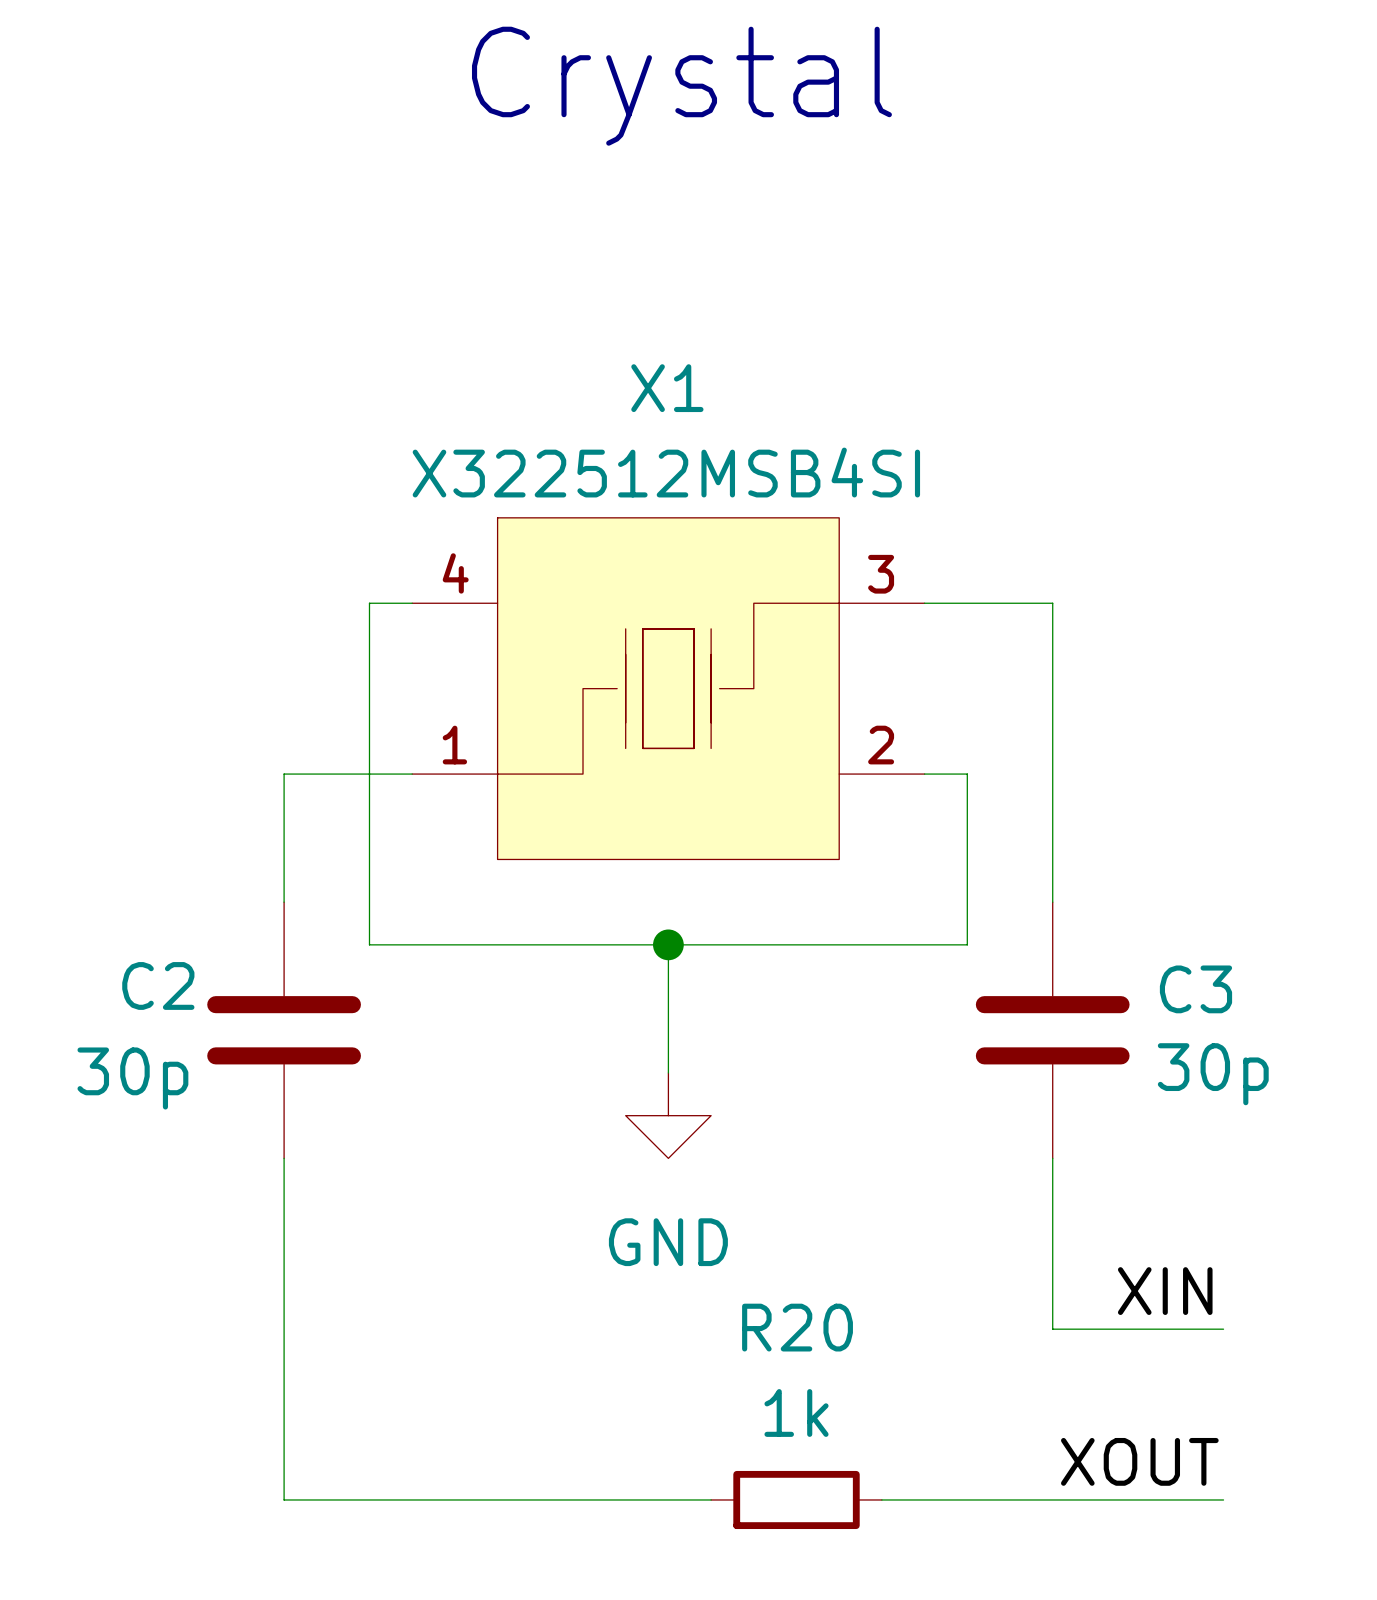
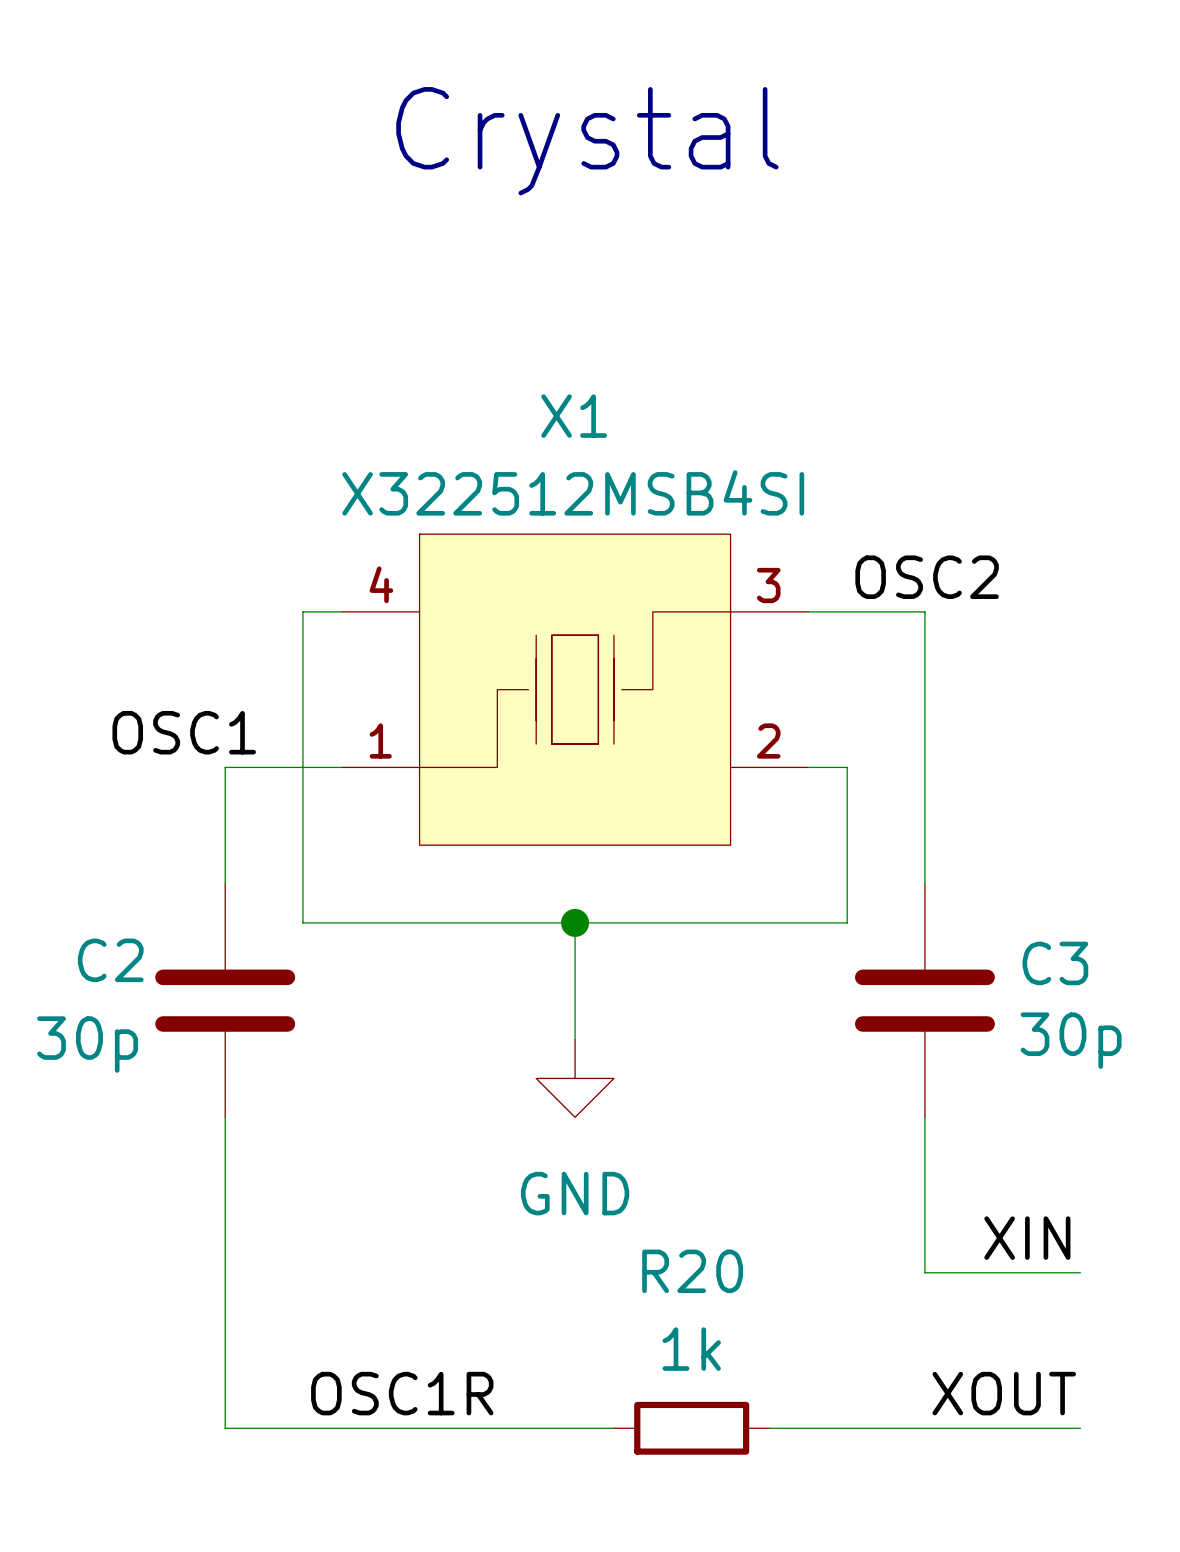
label: none -> OSC2 (927, 577)
label: none -> OSC1 (184, 732)
label: none -> OSC1R (402, 1393)

